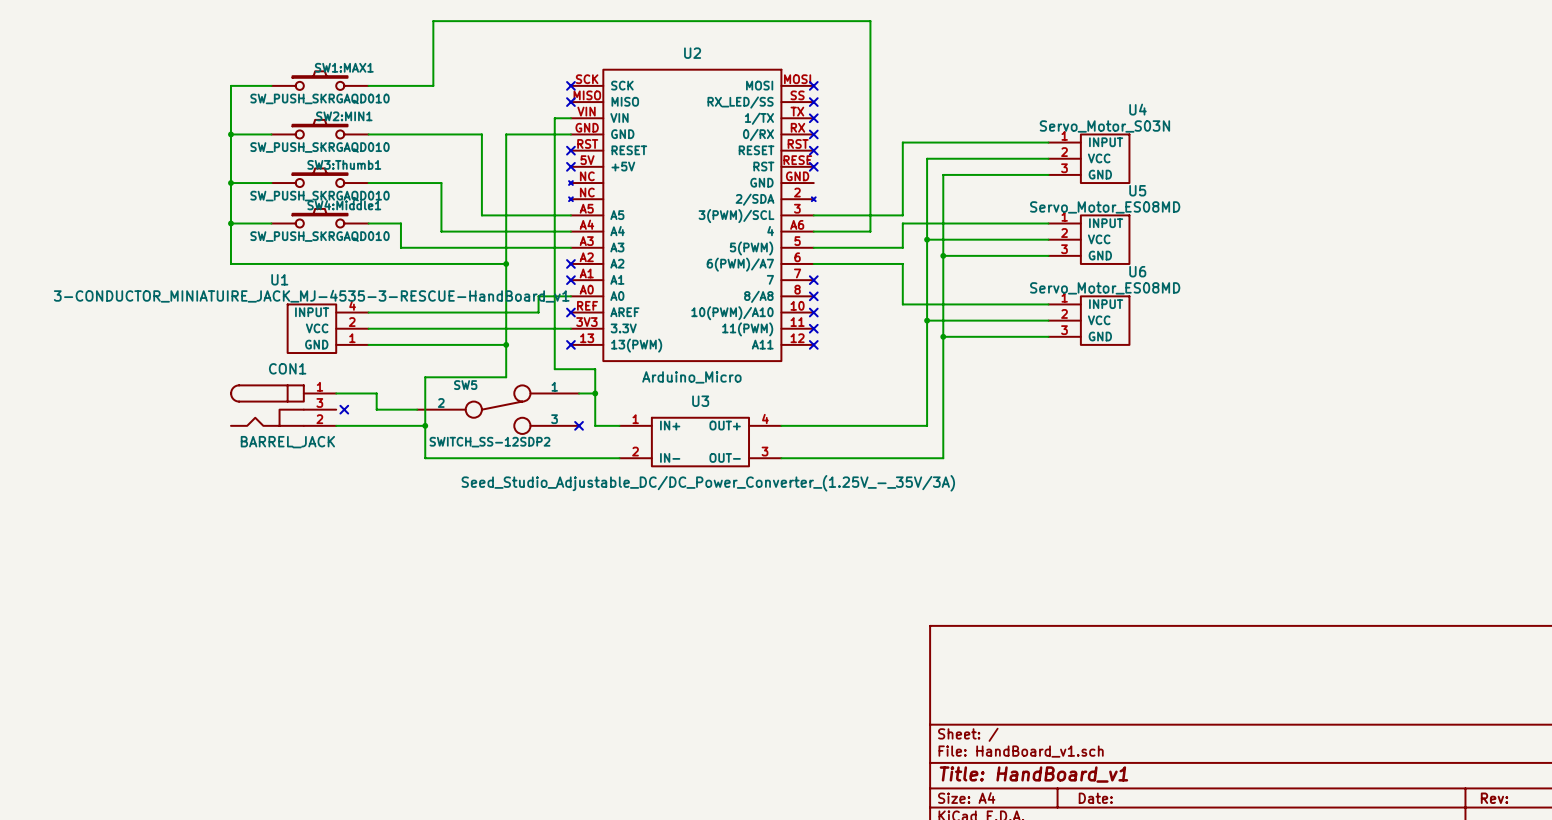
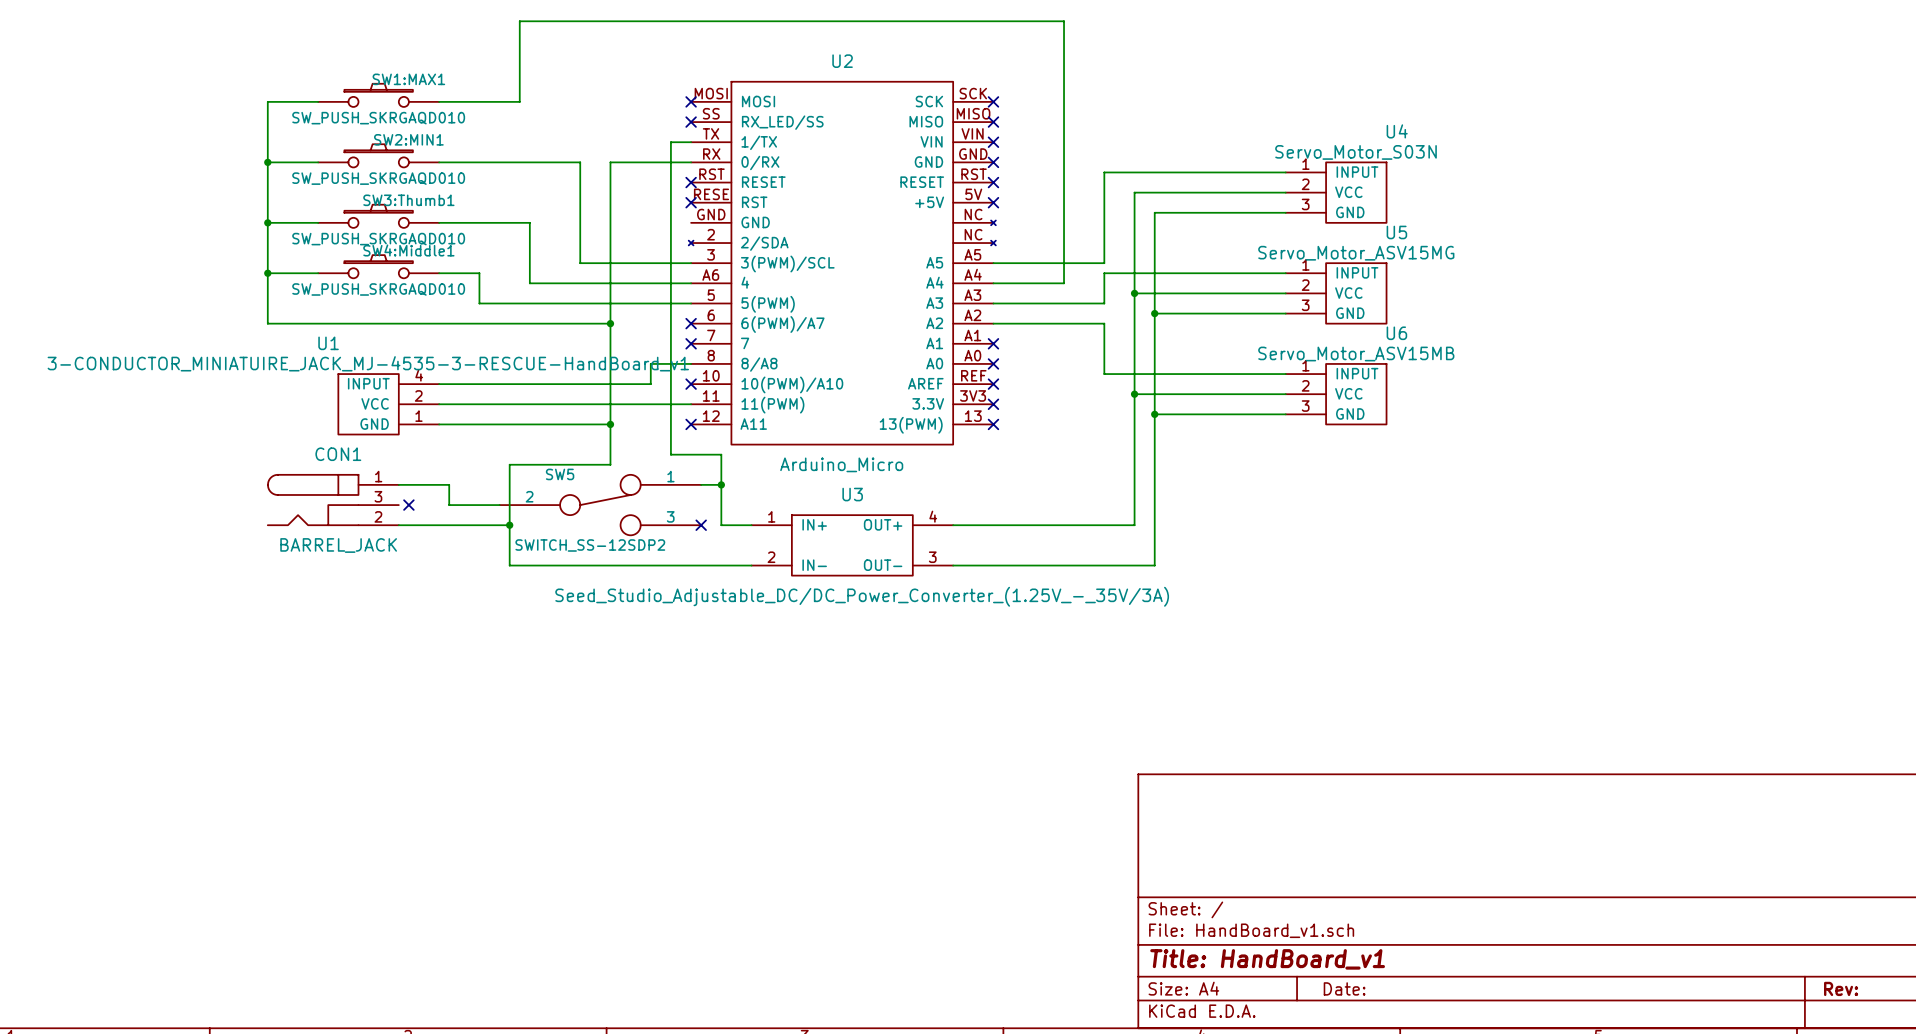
U5 value: Servo_Motor_ES08MD (1105, 207) -> Servo_Motor_ASV15MG (1356, 253)
U2 flip: as is (692, 215) -> left-right (842, 263)
U6 value: Servo_Motor_ES08MD (1105, 288) -> Servo_Motor_ASV15MB (1356, 354)

